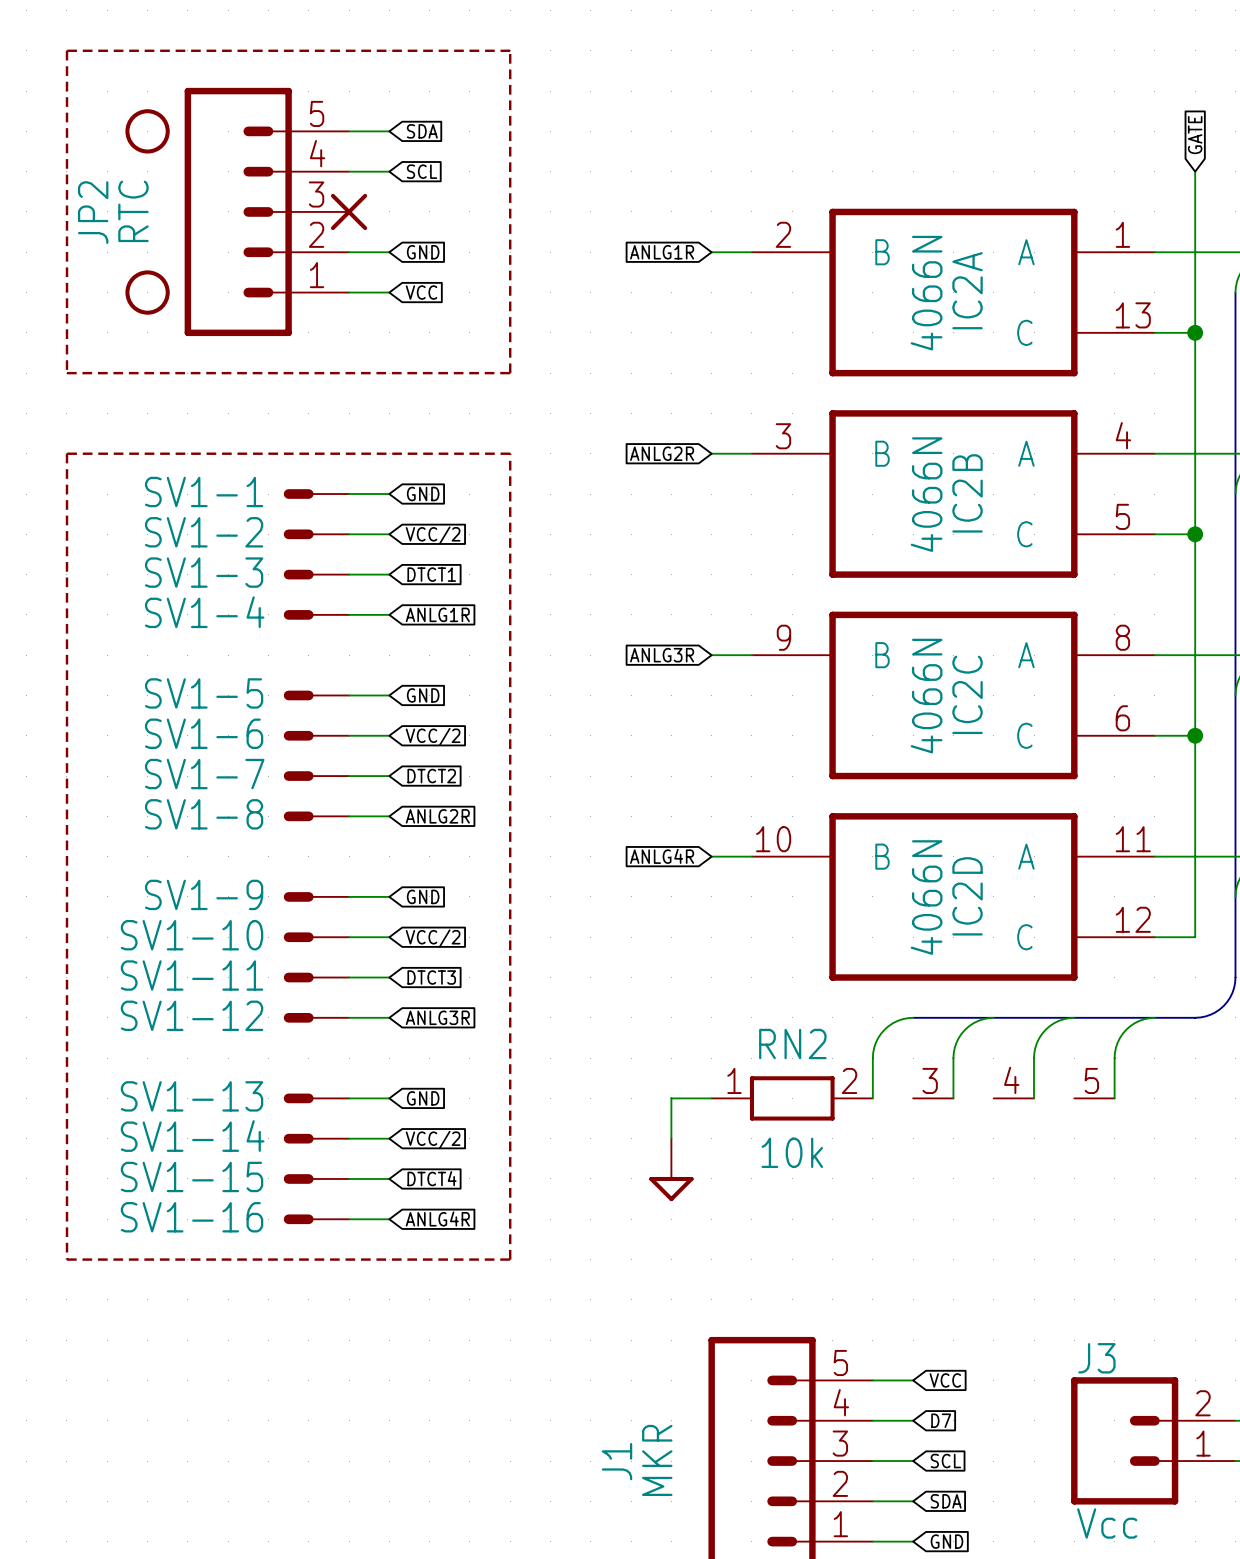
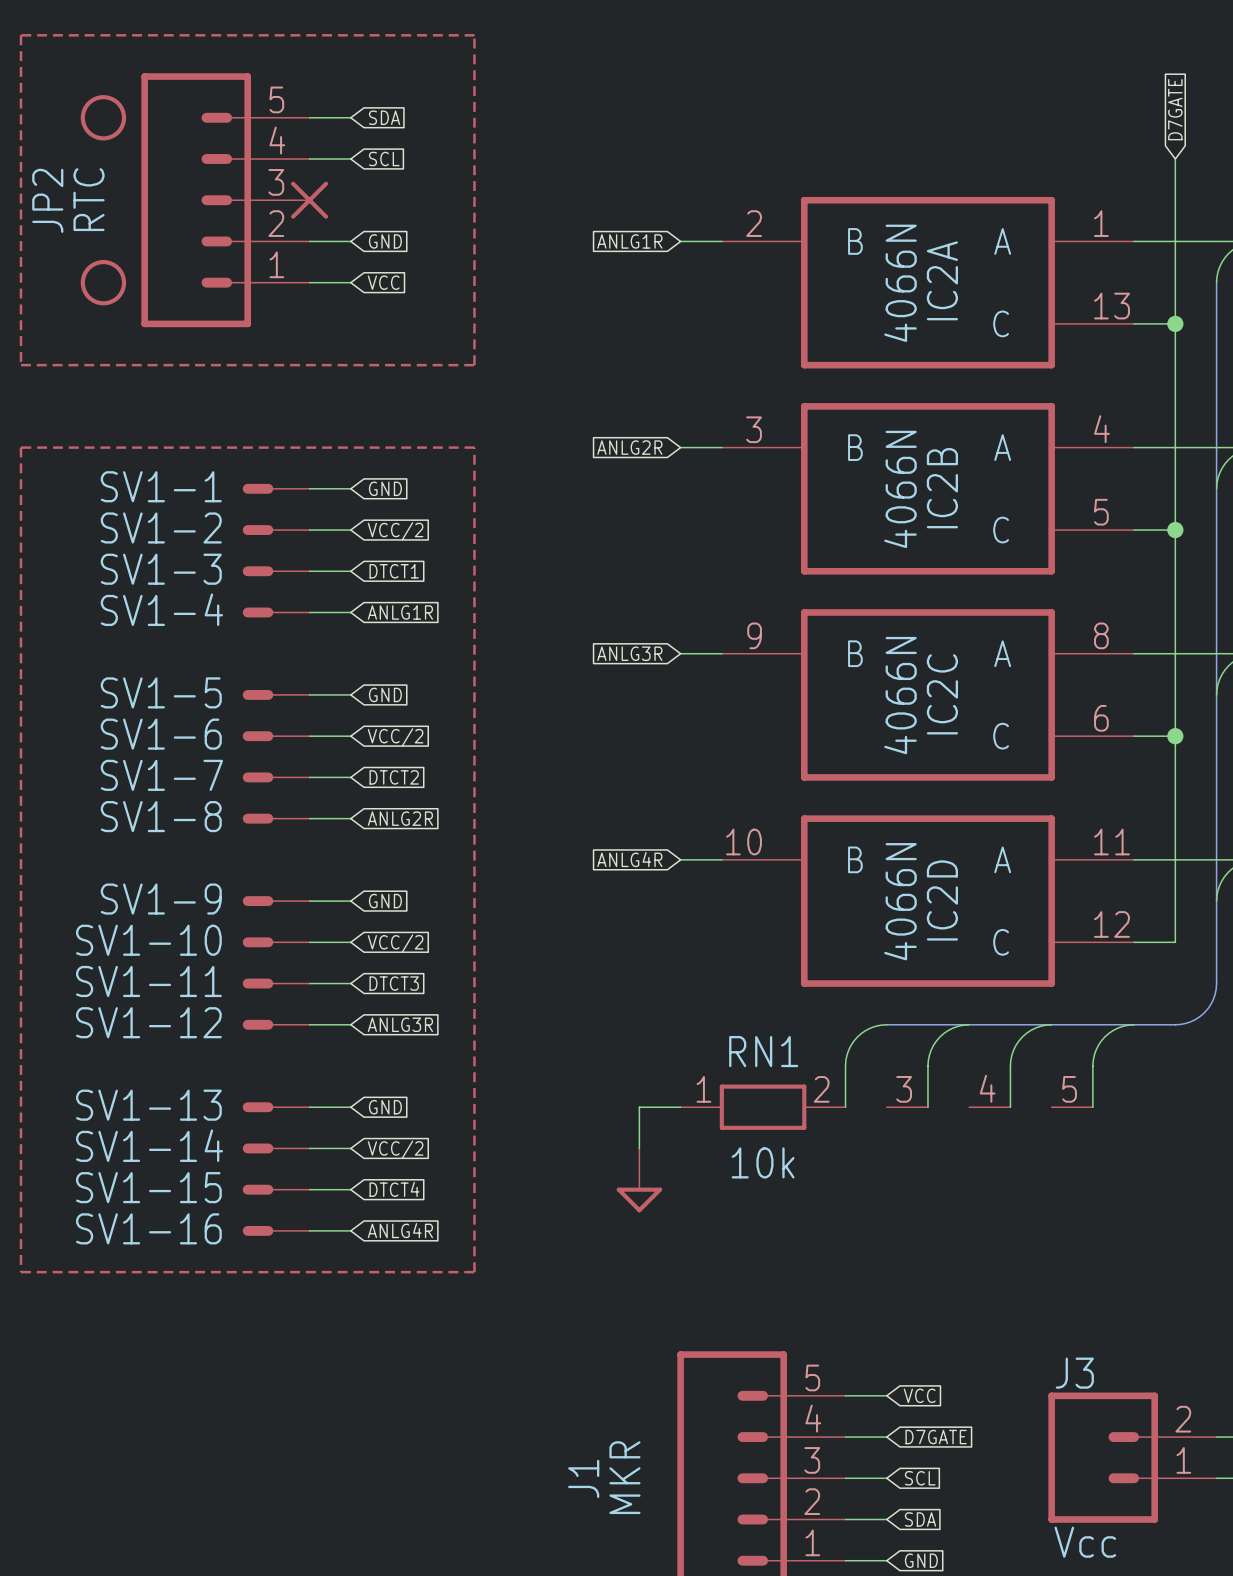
global label: GATE (1195, 135) -> D7GATE (1175, 109)
RN2 name: RN2 (792, 1044) -> RN1 (763, 1051)
global label: D7 (941, 1420) -> D7GATE (936, 1437)

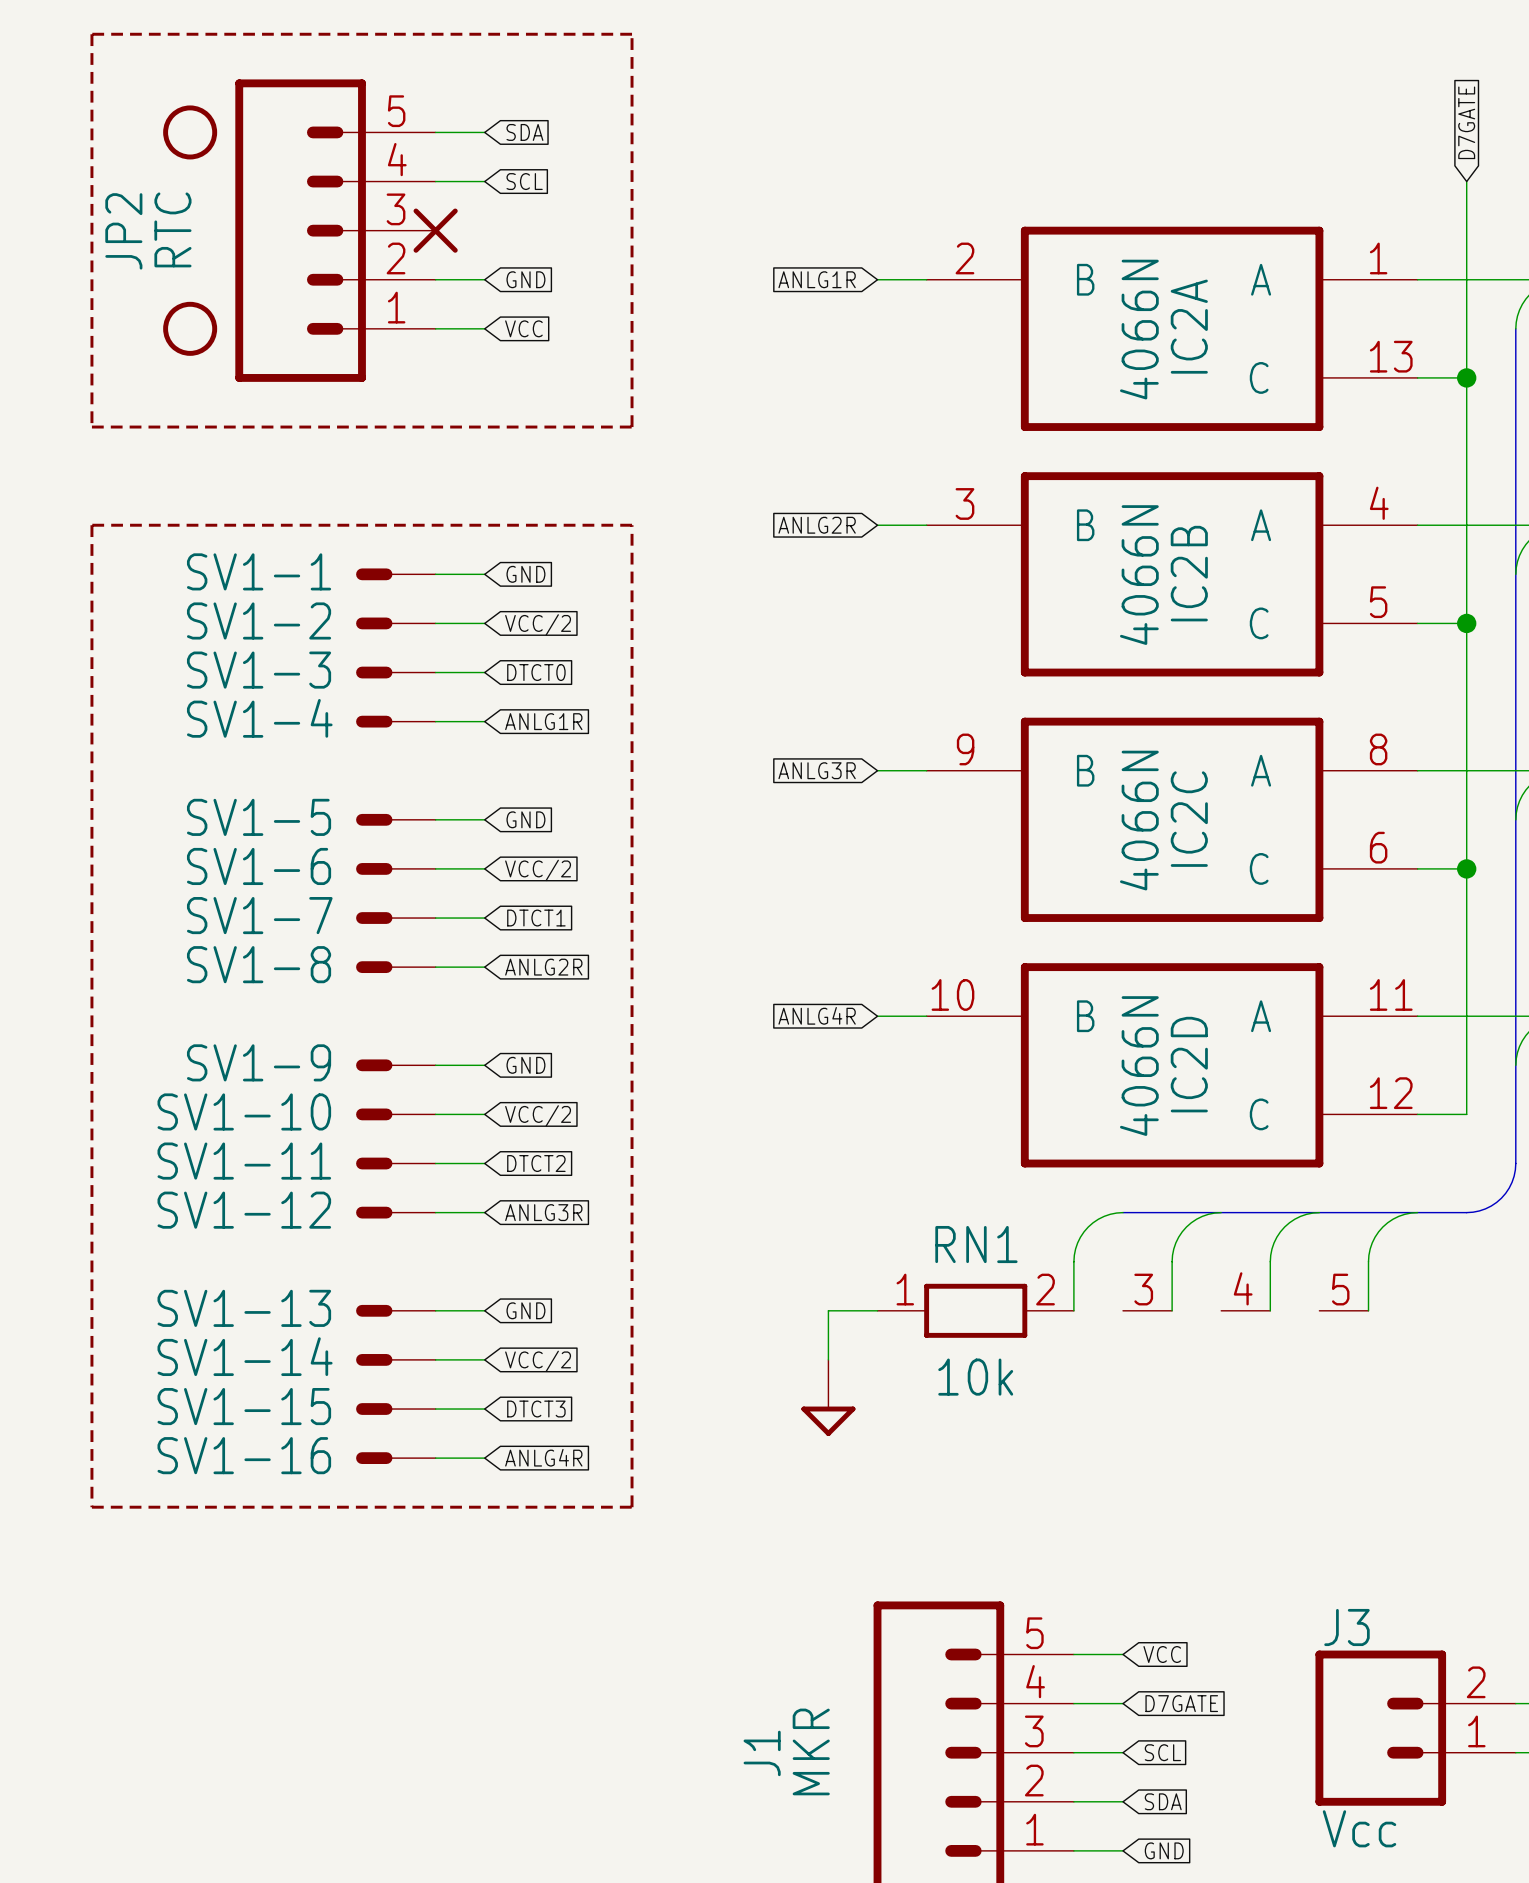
global label: DTCT1 (394, 571) -> DTCT0 (536, 672)
global label: DTCT2 (394, 777) -> DTCT1 (536, 918)
global label: DTCT3 (394, 983) -> DTCT2 (536, 1163)
global label: DTCT4 (394, 1189) -> DTCT3 (536, 1409)

